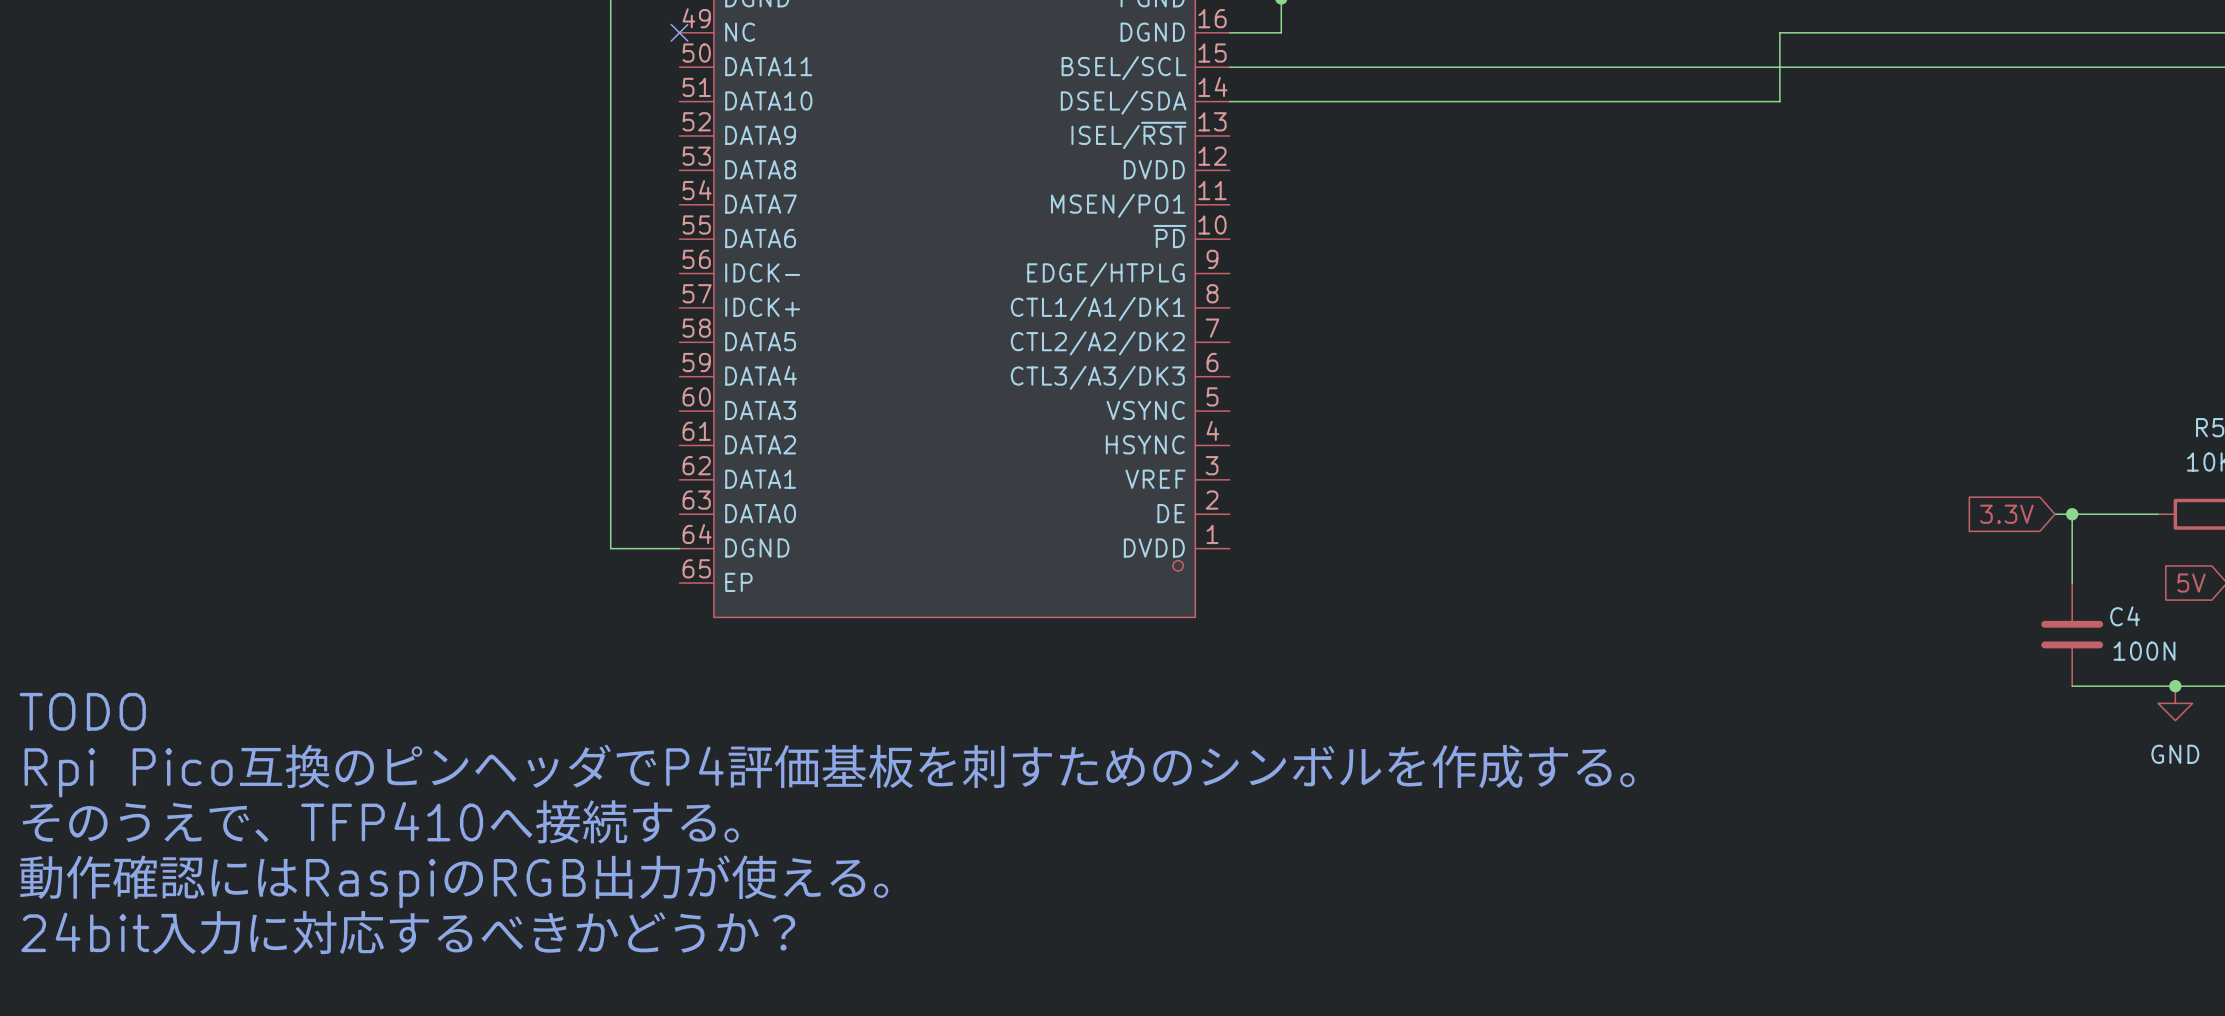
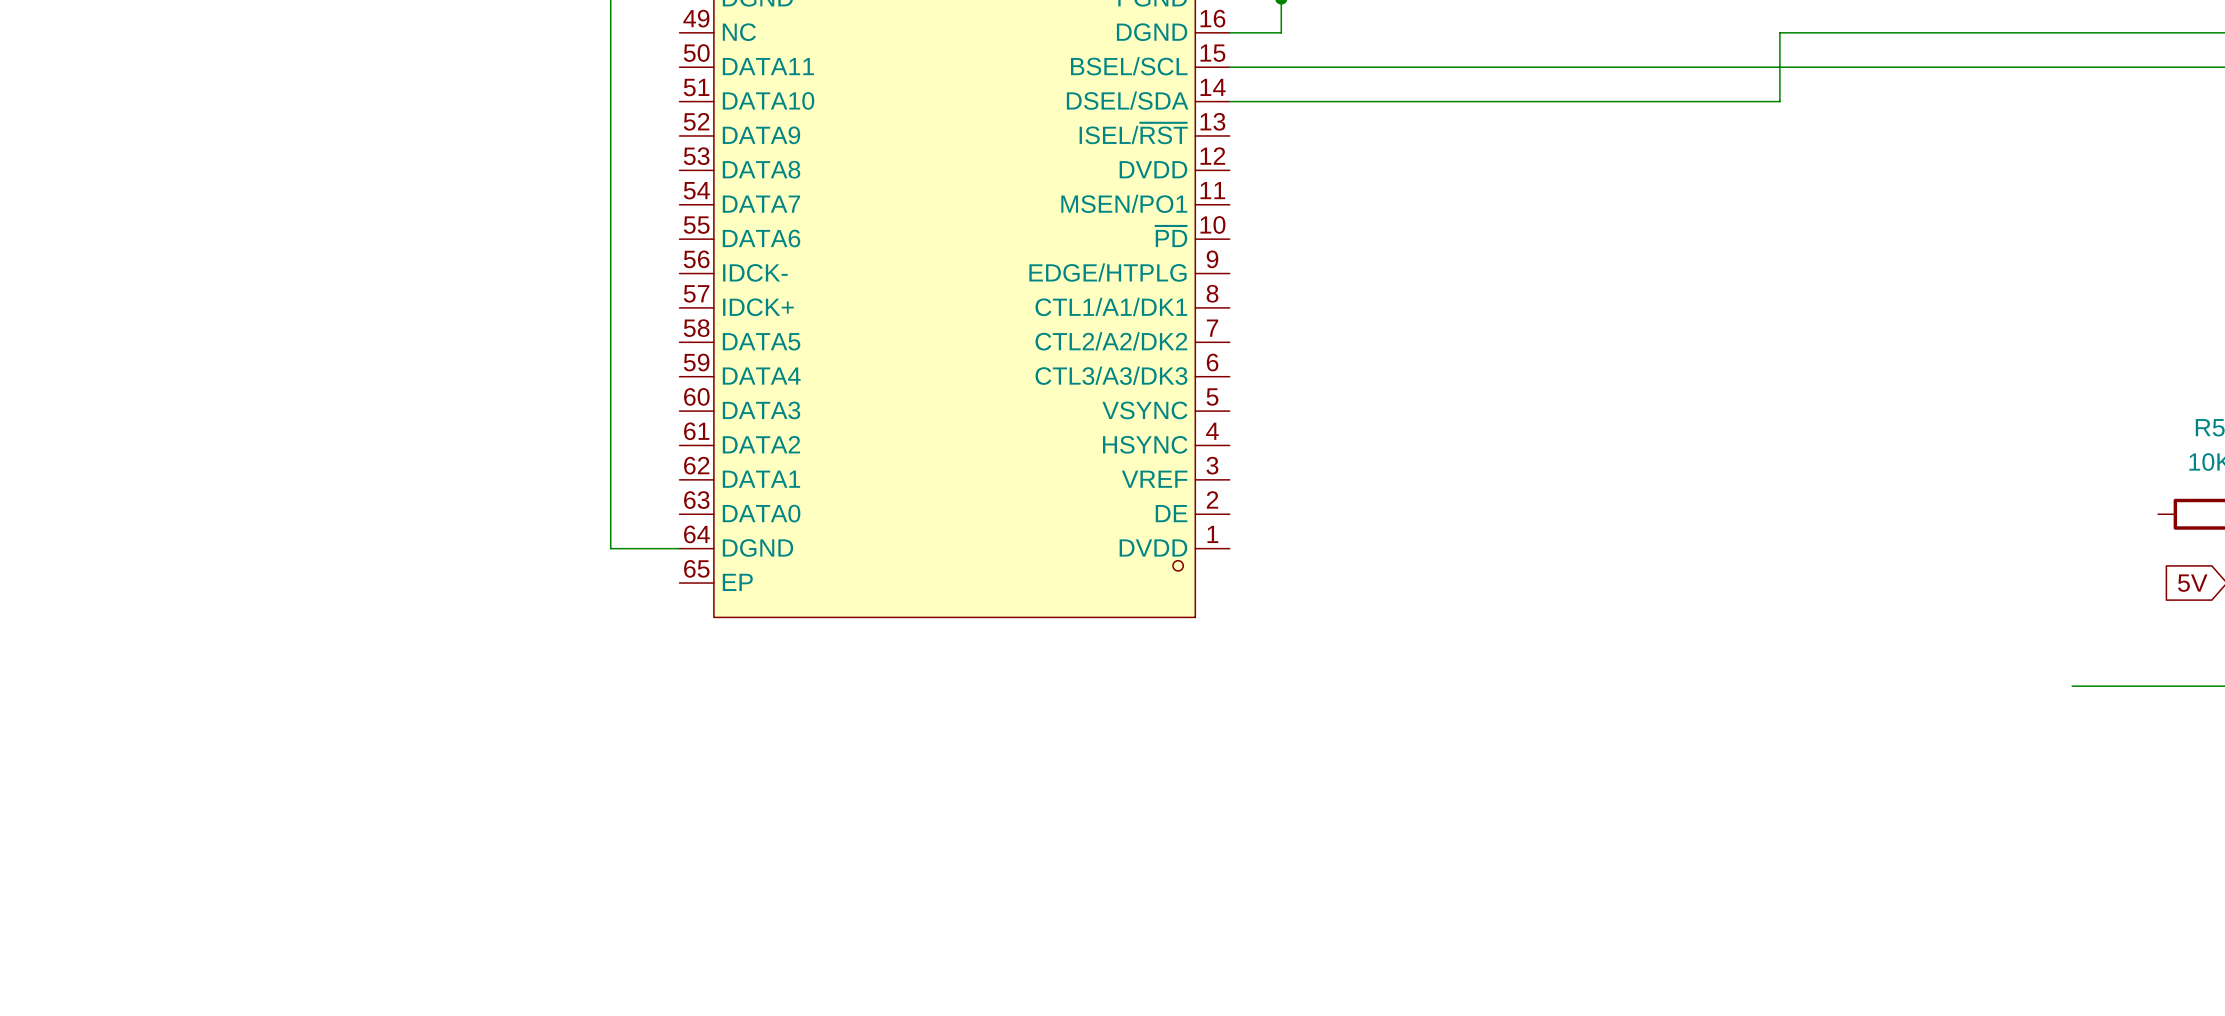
no-connect mark: (679, 32) -> none
global label: 3.3V (2006, 514) -> none
wire: (2054, 514) (2158, 514) -> none
wire: (2072, 514) (2072, 583) -> none
junction: (2072, 514) -> none
C4: 100N (2072, 634) -> none
junction: (2175, 686) -> none
power symbol: GND (2175, 703) -> none
text: TODO (82, 711) -> none
text: Rpi Pico互換のピンヘッダでP4評価基板を刺すためのシンボルを作成する。 (830, 770) -> none
text: そのうえで、TFP410へ接続する。 (380, 821) -> none
text: 動作確認にはRaspiのRGB出力が使える。 (454, 880) -> none
text: 24bit入力に対応するべきかどうか？ (409, 932) -> none

